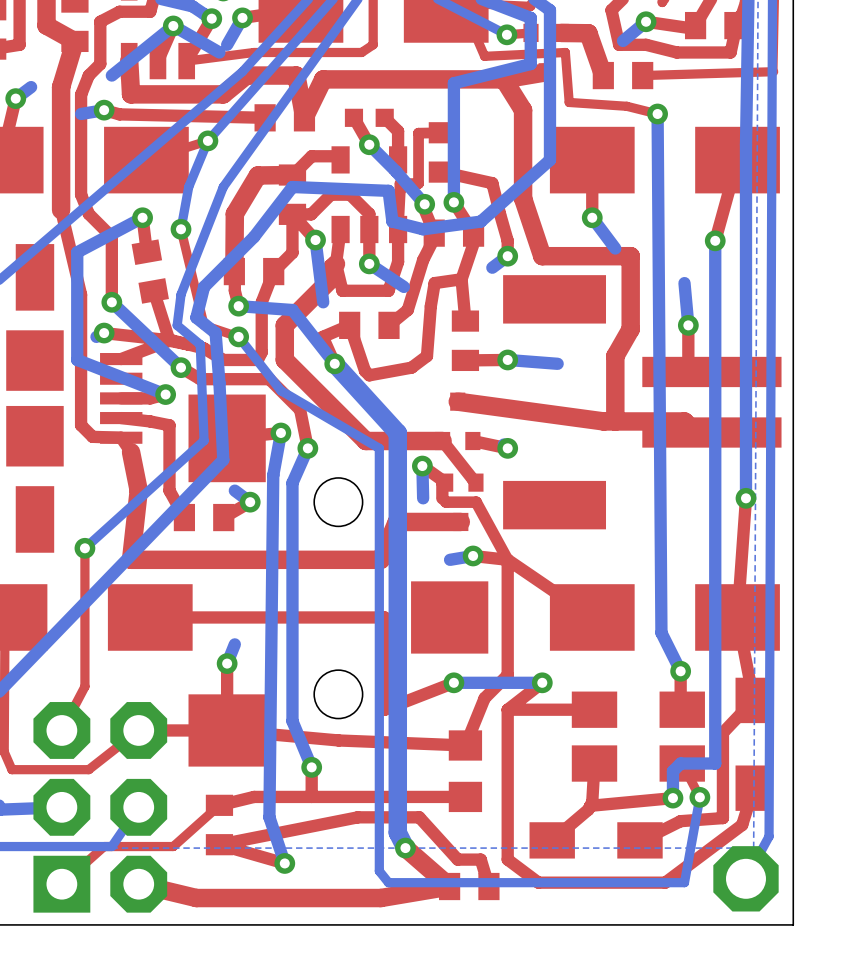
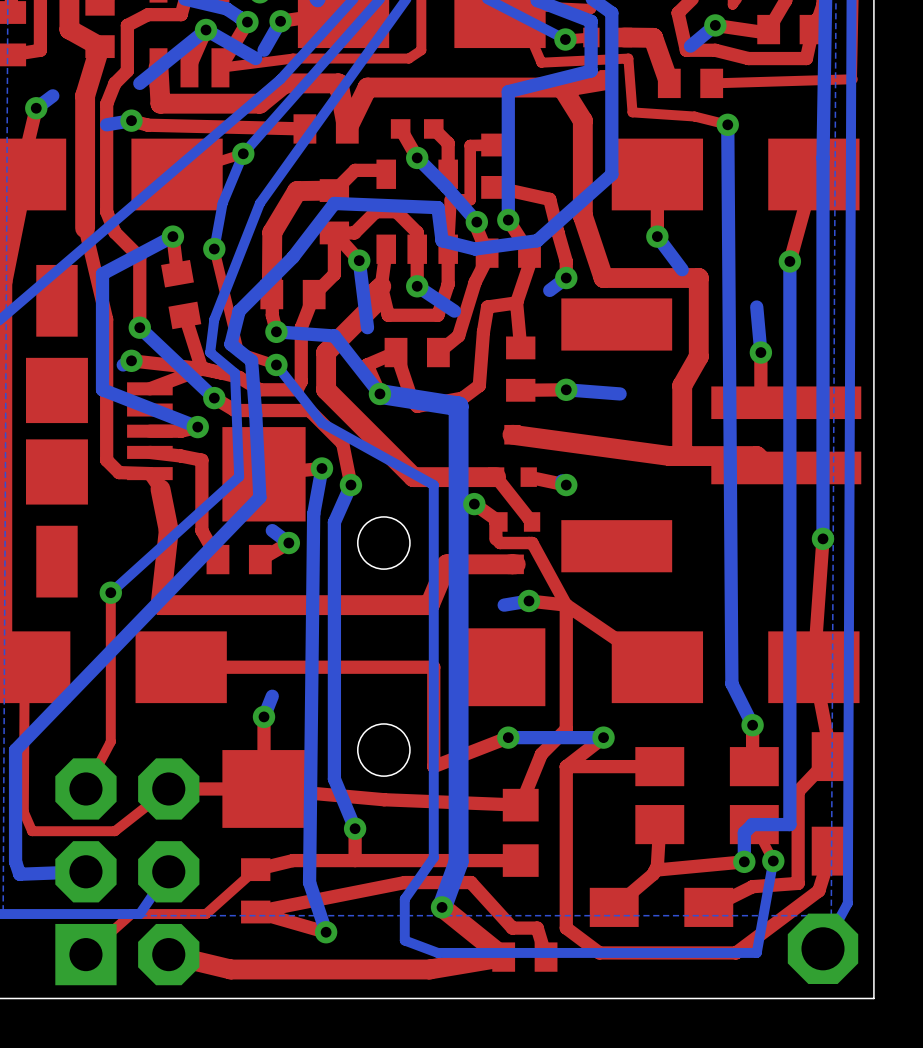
bottom track: (334, 363) (397, 432) (397, 832) (405, 848) -> (379, 393) (458, 406) (458, 861) (442, 907)
bottom track: (280, 390) (379, 448) (379, 871) (388, 882) -> (321, 422) (433, 485) (433, 857) (404, 899) (404, 940) (437, 952)
bottom track: (422, 466) (423, 498) -> none
top track: (405, 848) (449, 886) -> (442, 907) (503, 957)
via position: (405, 848) -> (442, 907)

